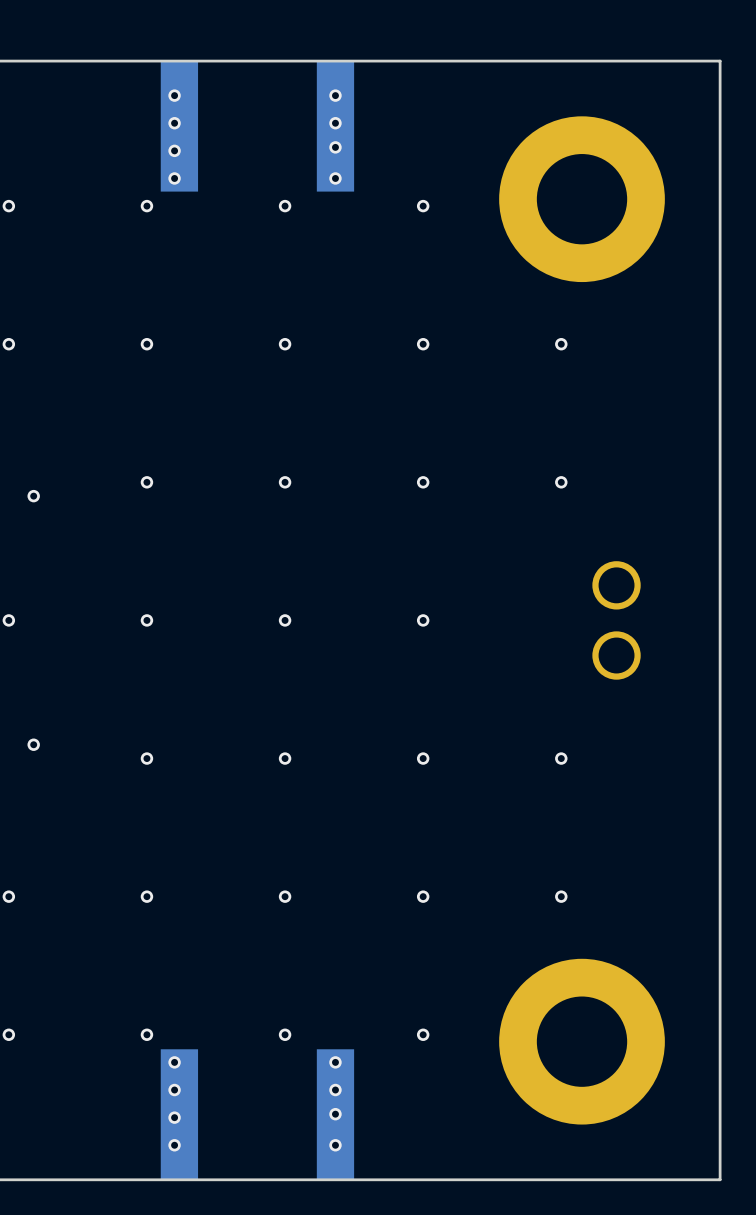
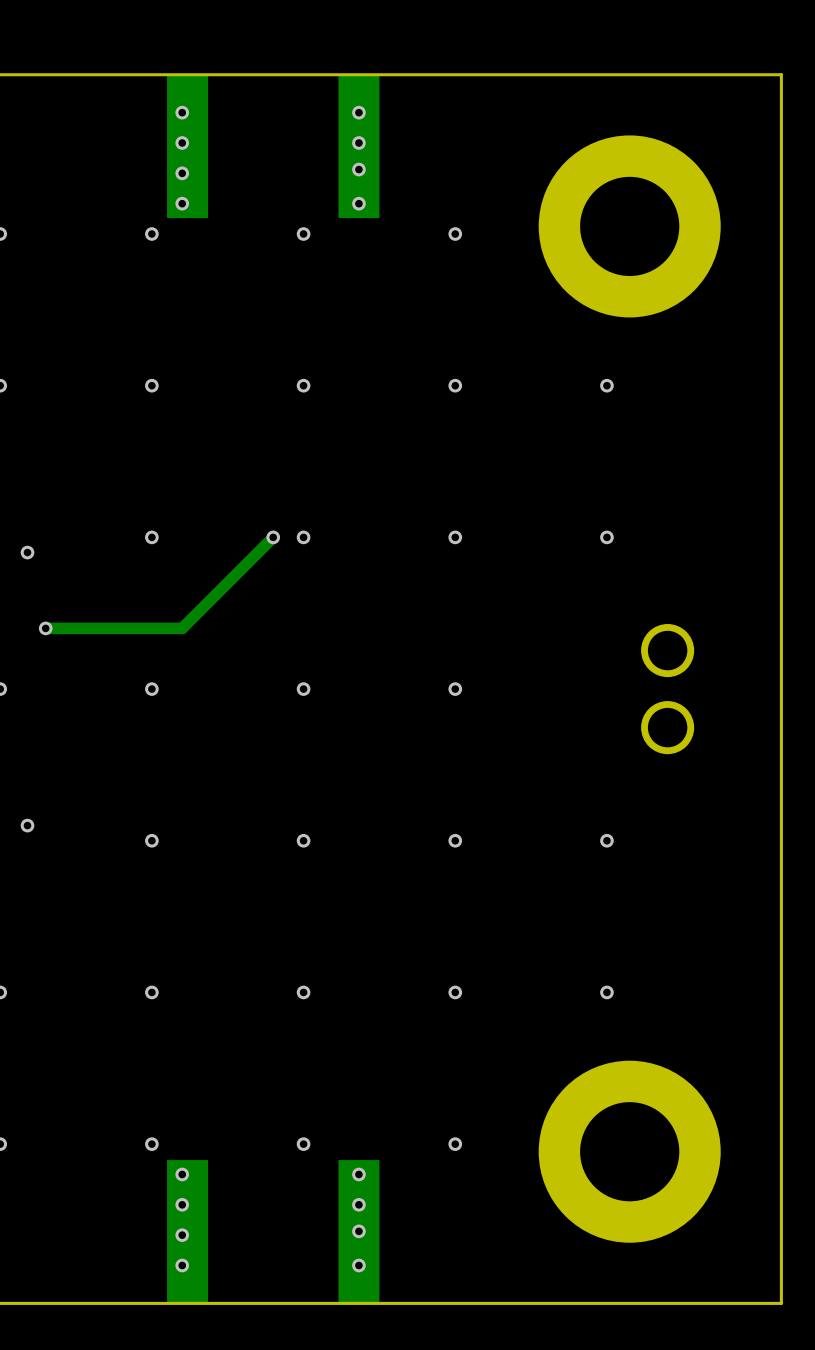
track: none -> (273, 537) (182, 628) (45, 628)
via: none -> (273, 537)
via: none -> (45, 628)

